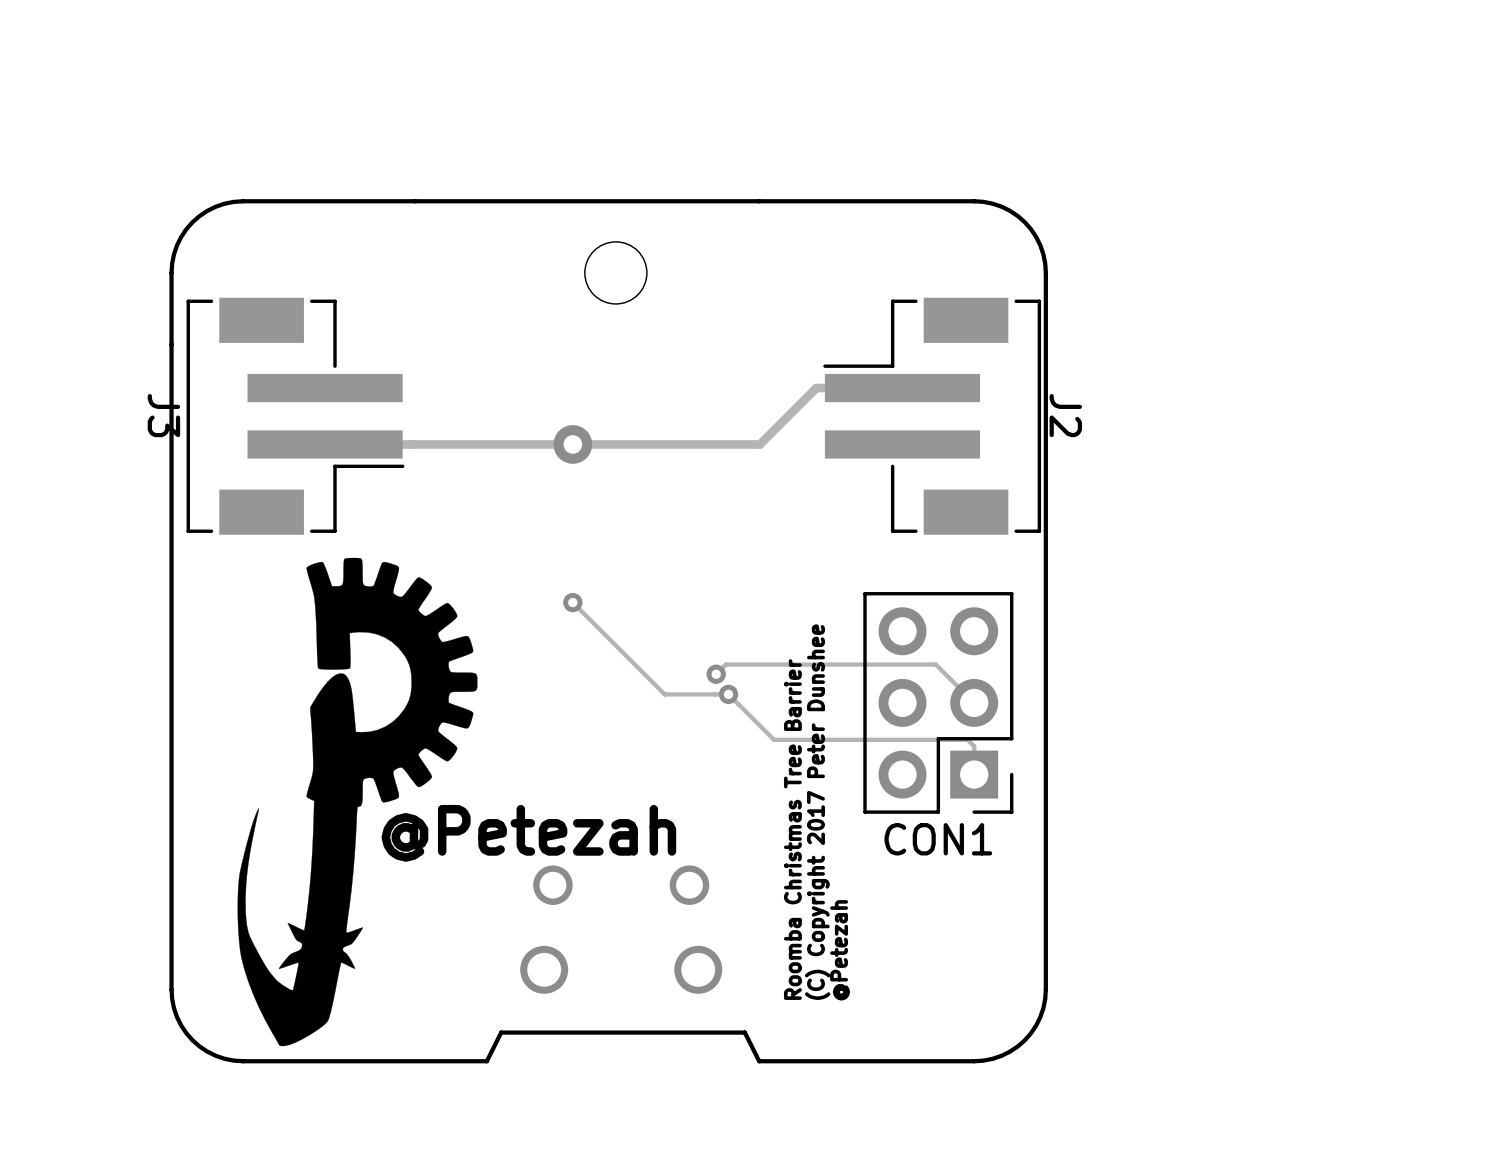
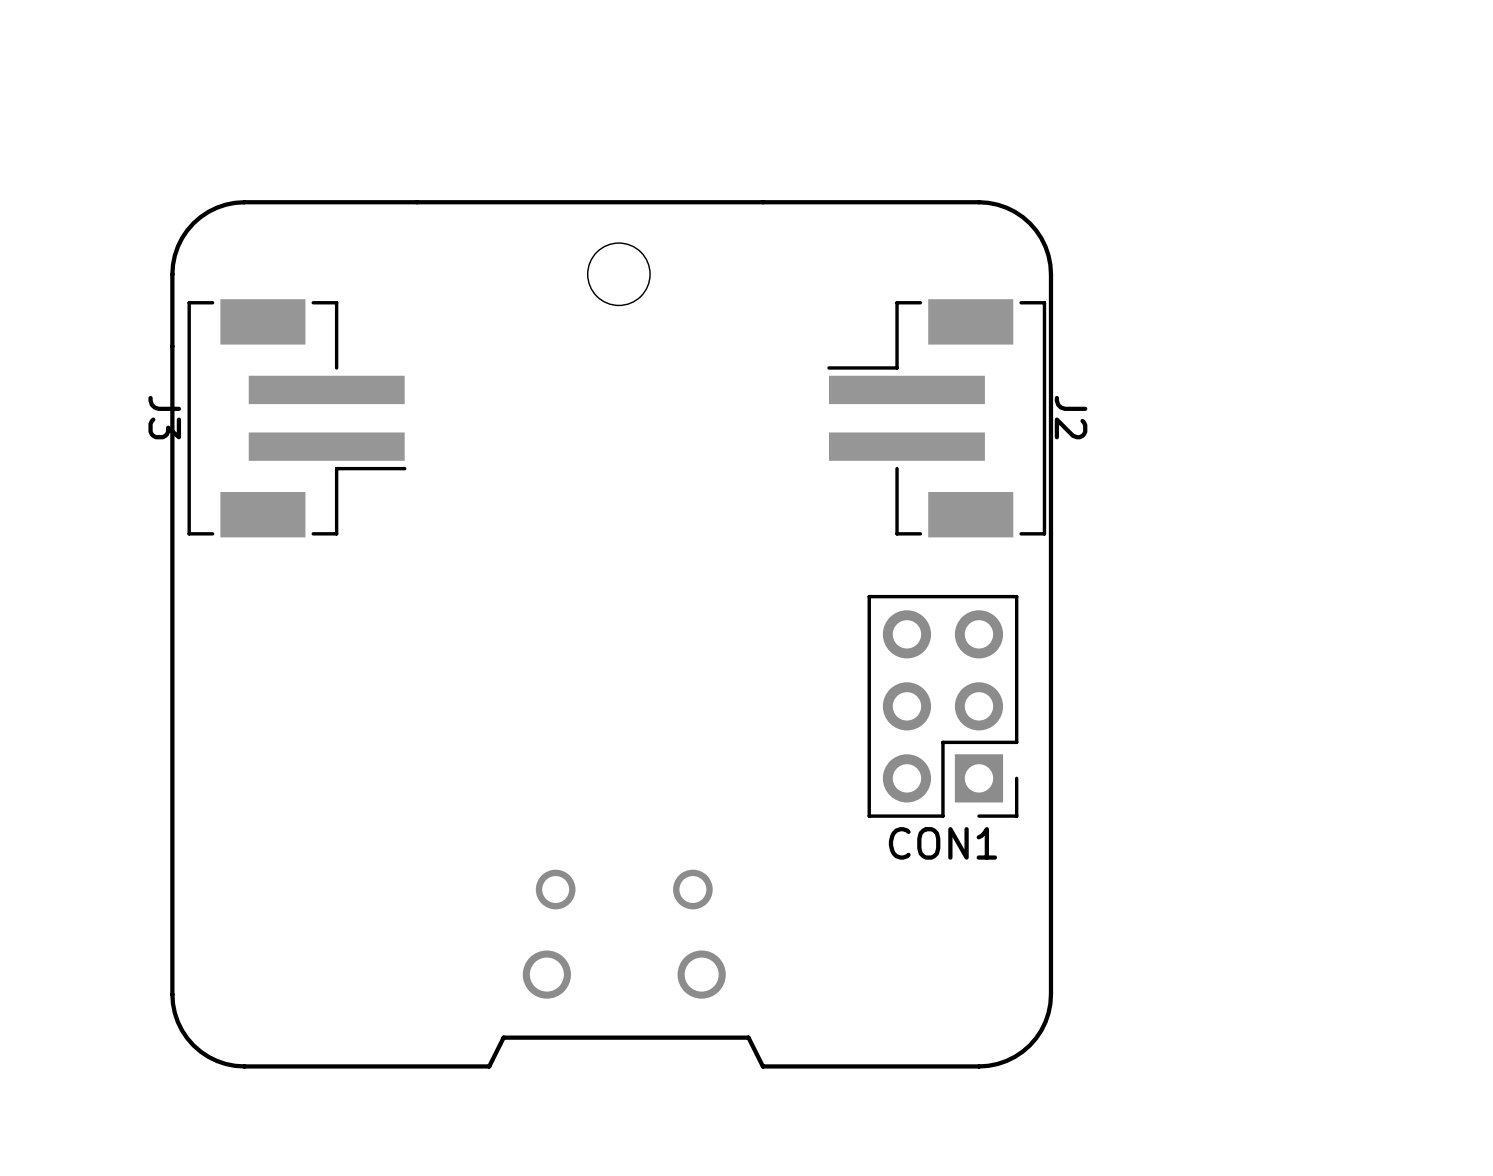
track: (902, 388) (816, 388) (759, 444) (325, 444) -> none
via: (572, 444) -> none
drawing: [237, 557, 478, 1047] -> none
track: (572, 602) (664, 694) (728, 694) (773, 739) (967, 739) (974, 746) (974, 774) -> none
via: (572, 602) -> none
track: (716, 674) (725, 664) (935, 664) (974, 702) -> none
via: (716, 674) -> none
via: (728, 694) -> none
text: (C) Copyright 2017 Peter Dunshee (817, 812) -> none
text: Roomba Christmas Tree Barrier (792, 829) -> none
text: @Petezah (528, 833) -> none
text: @Petezah (840, 950) -> none

